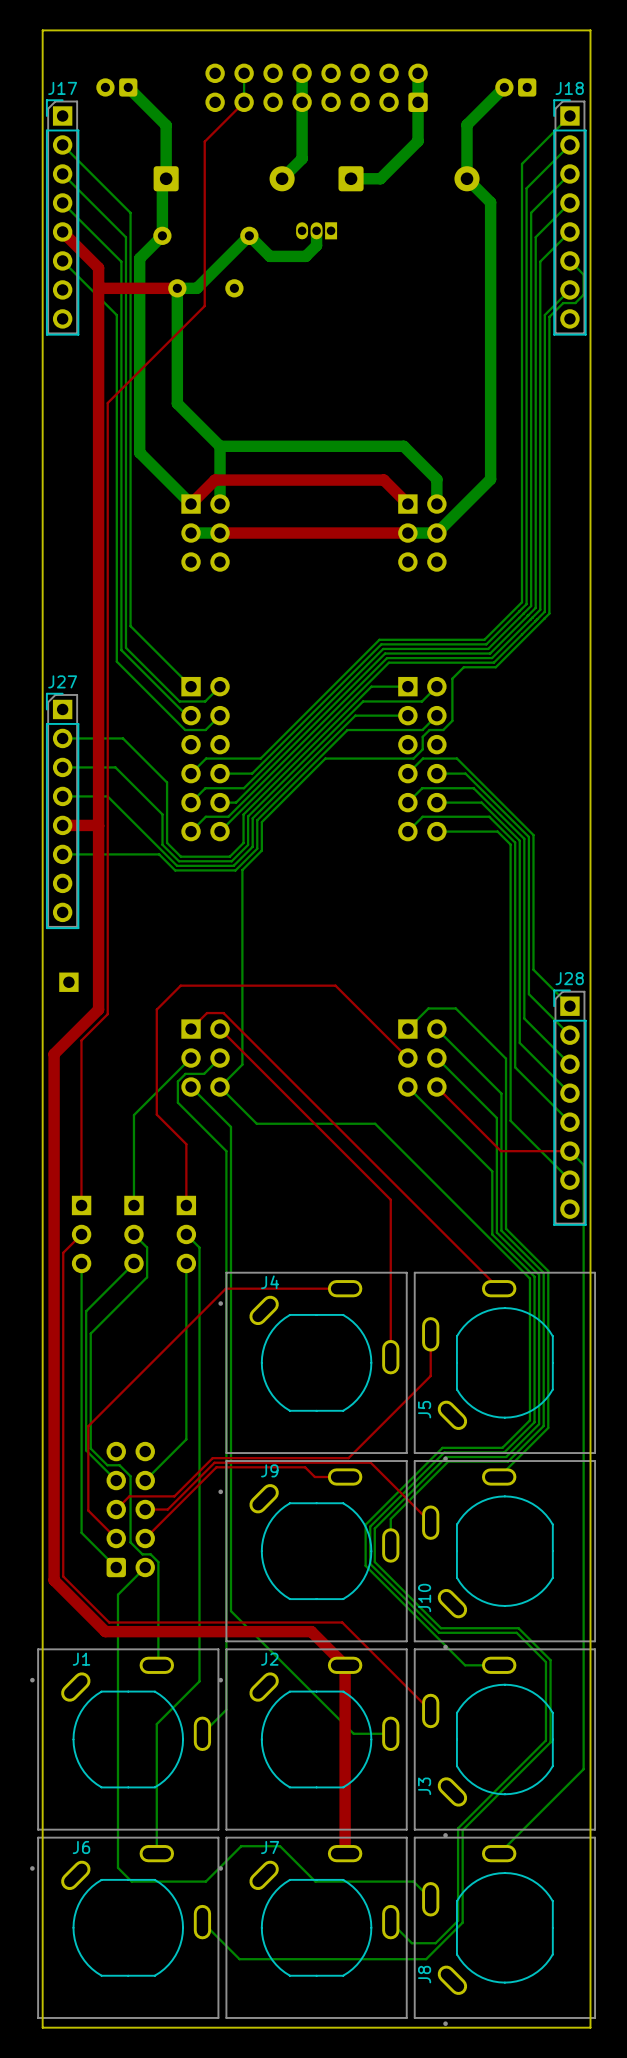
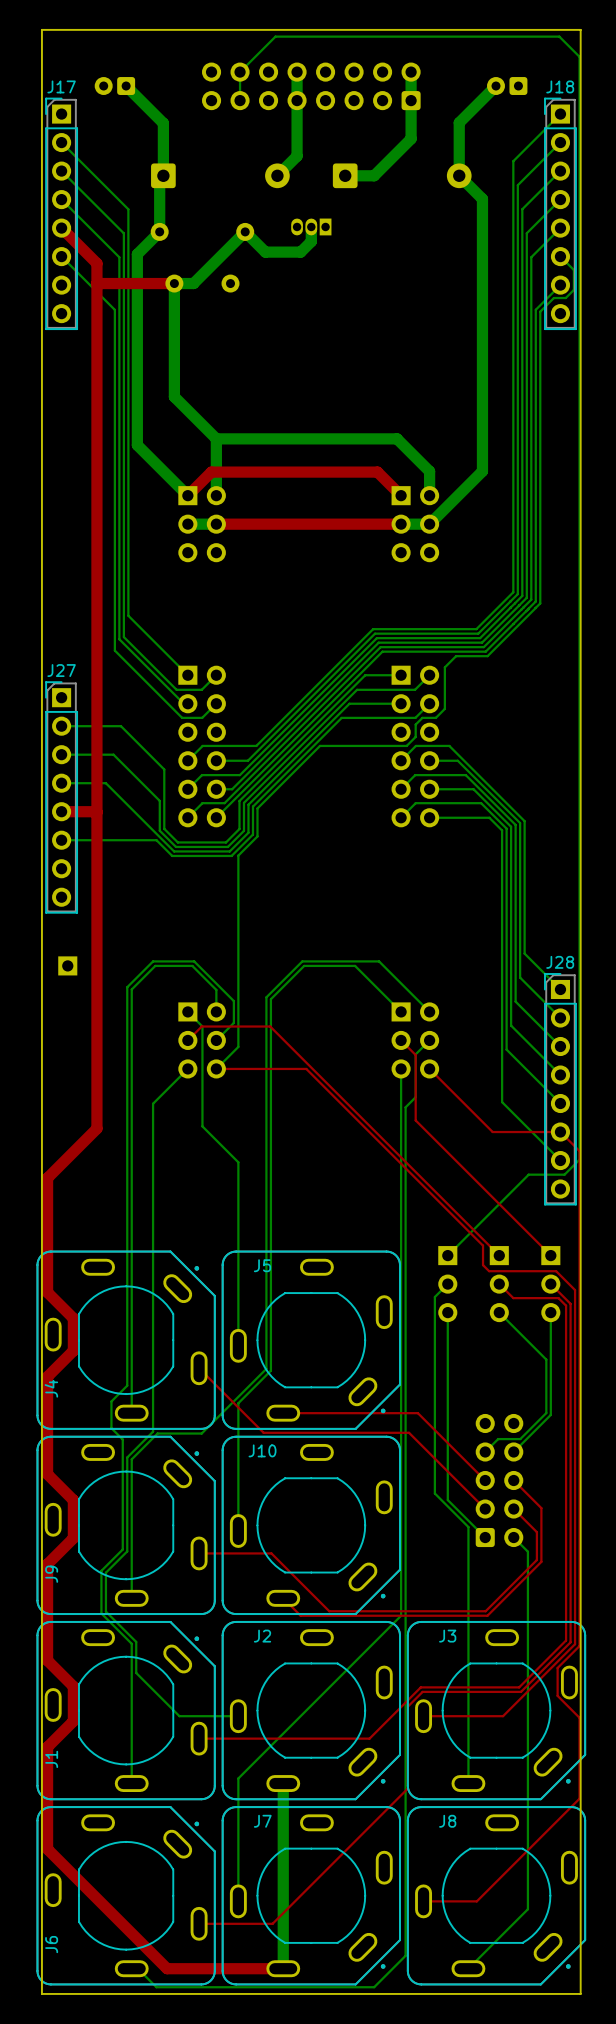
bottom track: none -> (240, 72) (275, 36) (559, 36) (579, 56) (579, 1159) (564, 1174) (528, 1174) (447, 1255)
top track: (244, 102) (204, 141) (204, 306) (107, 403) (107, 1014) (81, 1040) (81, 1205) -> none
top track: (98, 1009) (54, 1054) (54, 1580) (105, 1631) (311, 1631) (345, 1665) (345, 1853) -> (96, 992) (96, 1128) (47, 1178) (47, 1292) (73, 1318) (73, 1350) (47, 1376) (47, 1474) (73, 1500) (73, 1538) (47, 1564) (47, 1660) (73, 1686) (73, 1721) (47, 1747) (47, 1849) (167, 1968) (283, 1968)
bottom track: none -> (187, 1011) (202, 1026) (202, 1126) (238, 1162) (238, 1345)
top track: (191, 1029) (207, 1013) (223, 1013) (499, 1288) -> none
top track: (220, 1029) (390, 1199) (390, 1357) -> none
bottom track: (407, 1029) (428, 1008) (455, 1008) (506, 1058) (506, 1228) (548, 1270) (548, 1427) (499, 1477) -> (401, 1011) (355, 965) (304, 965) (270, 999) (270, 1370) (238, 1403) (238, 1531)
bottom track: (436, 1029) (501, 1093) (501, 1230) (543, 1272) (543, 1426) (508, 1461) (448, 1461) (390, 1519) (390, 1545) -> (429, 1011) (379, 961) (302, 961) (266, 997) (266, 1368) (201, 1433) (157, 1433) (131, 1459) (131, 1598)
bottom track: (191, 1058) (133, 1115) -> (216, 1011) (216, 989) (192, 965) (155, 965) (131, 989) (131, 1096)
top track: none -> (187, 1040) (201, 1026) (270, 1026) (499, 1255)
bottom track: (220, 1058) (204, 1073) (185, 1073) (177, 1081) (177, 1102) (226, 1151) (226, 1709) (202, 1733) -> (216, 1040) (233, 1022) (233, 1001) (194, 961) (153, 961) (127, 987) (127, 1385) (111, 1401) (111, 1428) (122, 1439) (122, 1549) (101, 1570) (101, 1613) (131, 1643) (131, 1783)
top track: (407, 1058) (335, 985) (180, 985) (156, 1009) (156, 1114) (186, 1144) (186, 1205) -> (401, 1040) (415, 1055) (415, 1120) (550, 1255)
bottom track: (436, 1058) (496, 1118) (496, 1232) (539, 1274) (539, 1424) (506, 1457) (446, 1457) (374, 1528) (374, 1562) (440, 1628) (518, 1628) (550, 1660) (550, 1742) (462, 1830) (462, 1922) (426, 1959) (239, 1959) (202, 1922) -> (429, 1040) (415, 1054) (415, 1097) (405, 1107) (405, 1955) (374, 1987) (156, 1987) (137, 1968) (131, 1968)
bottom track: (191, 1087) (230, 1126) (230, 1611) (353, 1733) (390, 1733) -> (187, 1068) (153, 1103) (153, 1431) (127, 1457) (127, 1551) (105, 1572) (105, 1611) (136, 1641) (136, 1672) (179, 1716) (238, 1716)
bottom track: (220, 1087) (256, 1123) (375, 1123) (529, 1278) (529, 1420) (502, 1447) (442, 1447) (365, 1524) (365, 1565) (465, 1665) (499, 1665) -> none
top track: none -> (216, 1068) (306, 1068) (483, 1245) (483, 1265) (489, 1271) (556, 1271) (575, 1290) (575, 1644) (503, 1716) (423, 1716)
bottom track: (407, 1087) (492, 1171) (492, 1234) (534, 1276) (534, 1422) (504, 1452) (444, 1452) (370, 1526) (370, 1563) (439, 1632) (516, 1632) (545, 1662) (545, 1740) (458, 1828) (458, 1920) (435, 1943) (411, 1943) (390, 1922) -> (401, 1068) (401, 1615) (238, 1778) (238, 1901)
bottom track: (569, 1151) (583, 1164) (583, 1769) (499, 1853) -> none
top track: none -> (560, 1132) (579, 1151) (579, 1646) (557, 1667) (557, 1695) (579, 1717) (579, 1798) (476, 1901) (423, 1901)
bottom track: none -> (131, 1185) (131, 1413)
top track: (81, 1234) (63, 1252) (63, 1576) (109, 1622) (342, 1622) (430, 1710) -> none
part: (81, 1234) -> none
bottom track: (133, 1234) (147, 1247) (147, 1277) (90, 1333) (90, 1448) (107, 1465) (119, 1465) (130, 1476) (130, 1542) (142, 1554) (150, 1554) (158, 1562) (158, 1663) (156, 1665) -> none
part: (133, 1234) -> none
bottom track: (186, 1234) (199, 1247) (199, 1681) (156, 1724) (156, 1853) -> none
part: (186, 1234) -> none
bottom track: (81, 1263) (81, 1532) (116, 1567) -> none
bottom track: (133, 1263) (86, 1311) (86, 1450) (116, 1480) -> none
bottom track: (186, 1263) (186, 1439) (145, 1480) -> none
J4 footprint: [218, 1271, 408, 1454] -> [36, 1250, 216, 1430]
J5 footprint: [414, 1271, 596, 1462] -> [221, 1250, 401, 1430]
J4 name position: J4 (270, 1282) -> J4 (51, 1388)
top track: (345, 1288) (225, 1288) (88, 1426) (88, 1510) (116, 1538) -> none
bottom track: none -> (447, 1284) (434, 1297) (434, 1493) (468, 1527) (468, 1783)
part: none -> (447, 1284)
top track: none -> (499, 1284) (513, 1298) (558, 1298) (566, 1305) (566, 1640) (519, 1687) (420, 1687) (369, 1738) (199, 1738)
part: none -> (499, 1284)
top track: none -> (550, 1284) (570, 1303) (570, 1642) (521, 1691) (422, 1691) (407, 1706) (407, 1788) (272, 1923) (199, 1923)
part: none -> (550, 1284)
top track: (430, 1334) (430, 1375) (348, 1458) (212, 1458) (174, 1496) (129, 1496) (116, 1509) -> none
bottom track: none -> (447, 1312) (447, 1500) (485, 1537)
bottom track: none -> (499, 1312) (546, 1359) (546, 1413) (520, 1439) (498, 1439) (485, 1451)
bottom track: none -> (550, 1312) (550, 1414) (513, 1451)
top track: none -> (199, 1368) (263, 1432) (409, 1432) (485, 1509)
J5 name position: J5 (424, 1409) -> J5 (262, 1265)
top track: none -> (283, 1413) (417, 1413) (485, 1480)
J9 footprint: [218, 1460, 408, 1643] -> [36, 1436, 216, 1615]
J10 footprint: [414, 1460, 596, 1650] -> [221, 1436, 401, 1615]
J9 name position: J9 (269, 1470) -> J9 (51, 1574)
top track: (345, 1477) (314, 1477) (305, 1467) (216, 1467) (145, 1538) -> none
part: none -> (499, 1480)
top track: none -> (513, 1480) (541, 1508) (541, 1561) (487, 1615) (300, 1615) (283, 1598)
part: (130, 1509) -> none
top track: (145, 1509) (167, 1509) (214, 1462) (370, 1462) (430, 1522) -> none
top track: none -> (513, 1509) (536, 1532) (536, 1560) (485, 1611) (329, 1611) (271, 1553) (199, 1553)
bottom track: none -> (513, 1537) (527, 1551) (527, 1909) (468, 1968)
bottom track: (145, 1567) (117, 1594) (117, 1867) (131, 1881) (205, 1881) (241, 1846) (280, 1846) (315, 1881) (413, 1881) (430, 1899) -> none
J10 name position: J10 (424, 1597) -> J10 (262, 1450)
J1 footprint: [30, 1648, 220, 1831] -> [36, 1621, 216, 1800]
J2 footprint: [218, 1648, 408, 1831] -> [221, 1621, 401, 1800]
J3 footprint: [414, 1648, 596, 1838] -> [407, 1621, 586, 1800]
J1 name position: J1 (81, 1659) -> J1 (51, 1759)
J3 name position: J3 (424, 1786) -> J3 (447, 1636)
bottom track: none -> (283, 1783) (283, 1968)
J6 footprint: [30, 1836, 220, 2019] -> [36, 1806, 216, 1986]
J7 footprint: [218, 1836, 408, 2019] -> [221, 1806, 401, 1986]
J8 footprint: [414, 1836, 596, 2026] -> [407, 1806, 586, 1986]
J6 name position: J6 (81, 1847) -> J6 (51, 1944)
J8 name position: J8 (424, 1974) -> J8 (447, 1821)

